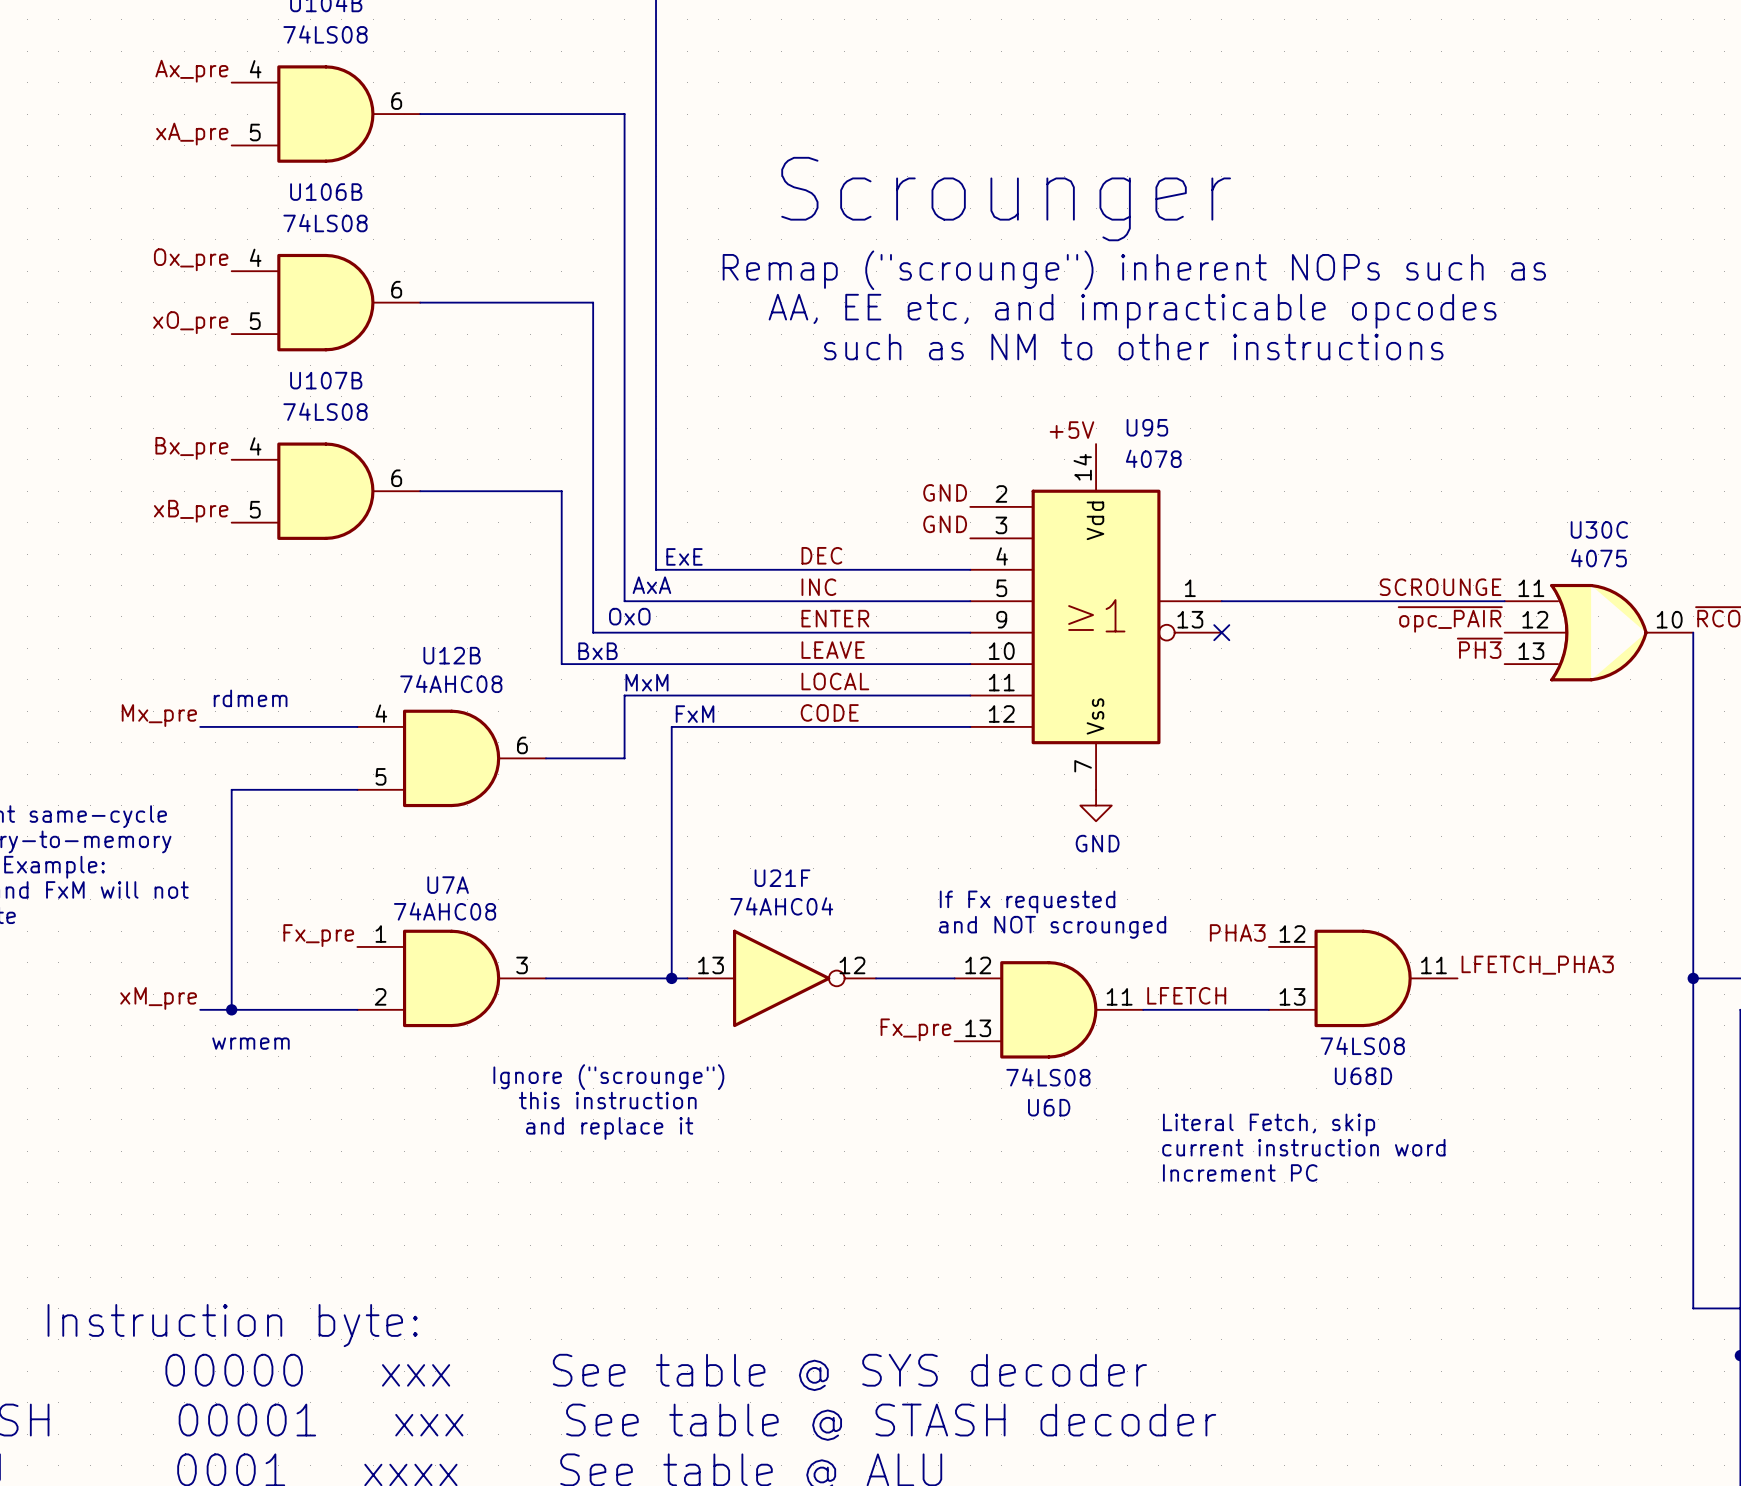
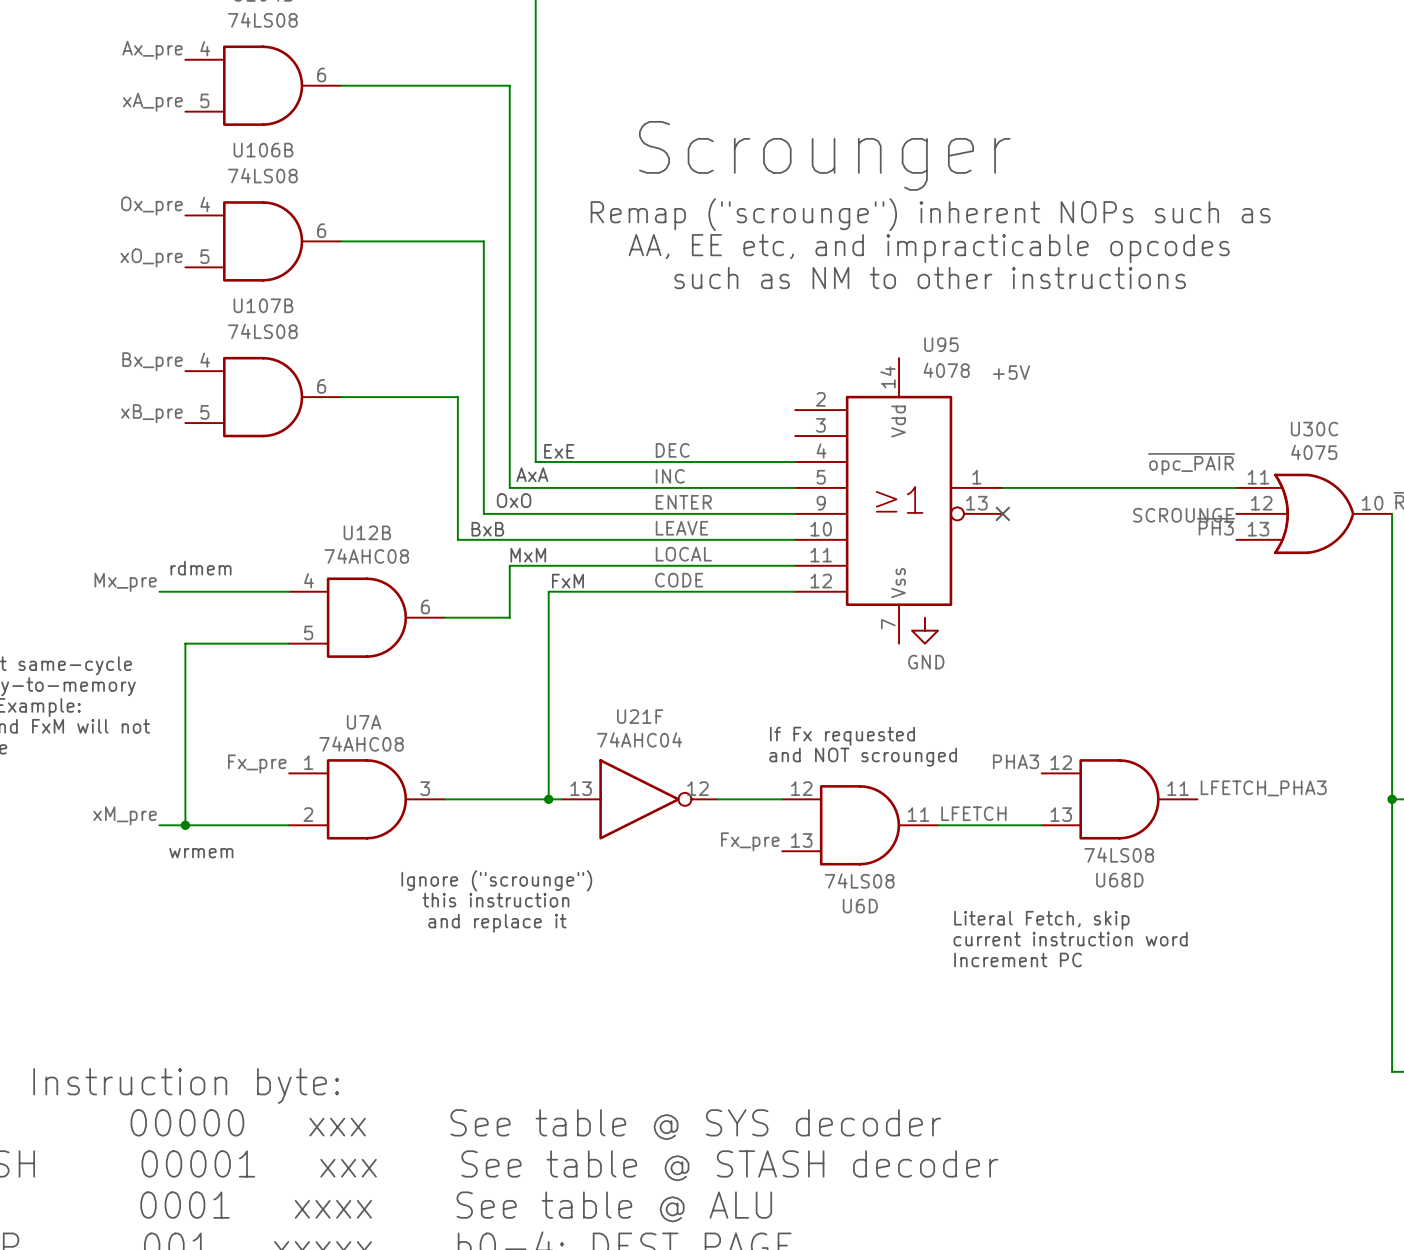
label position: +5V (1071, 430) -> +5V (1011, 372)
label: GND (945, 492) -> none
label: GND (945, 524) -> none
label position: SCROUNGE (1440, 587) -> SCROUNGE (1183, 515)
label position: ~{opc_PAIR} (1450, 619) -> ~{opc_PAIR} (1191, 464)
power symbol position: GND (1096, 805) -> GND (924, 630)

